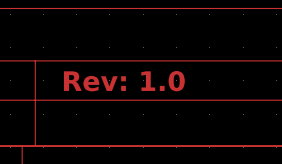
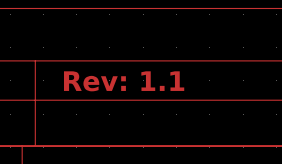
title block: Rev: 1.0 (124, 81) -> Rev: 1.1 (124, 81)

